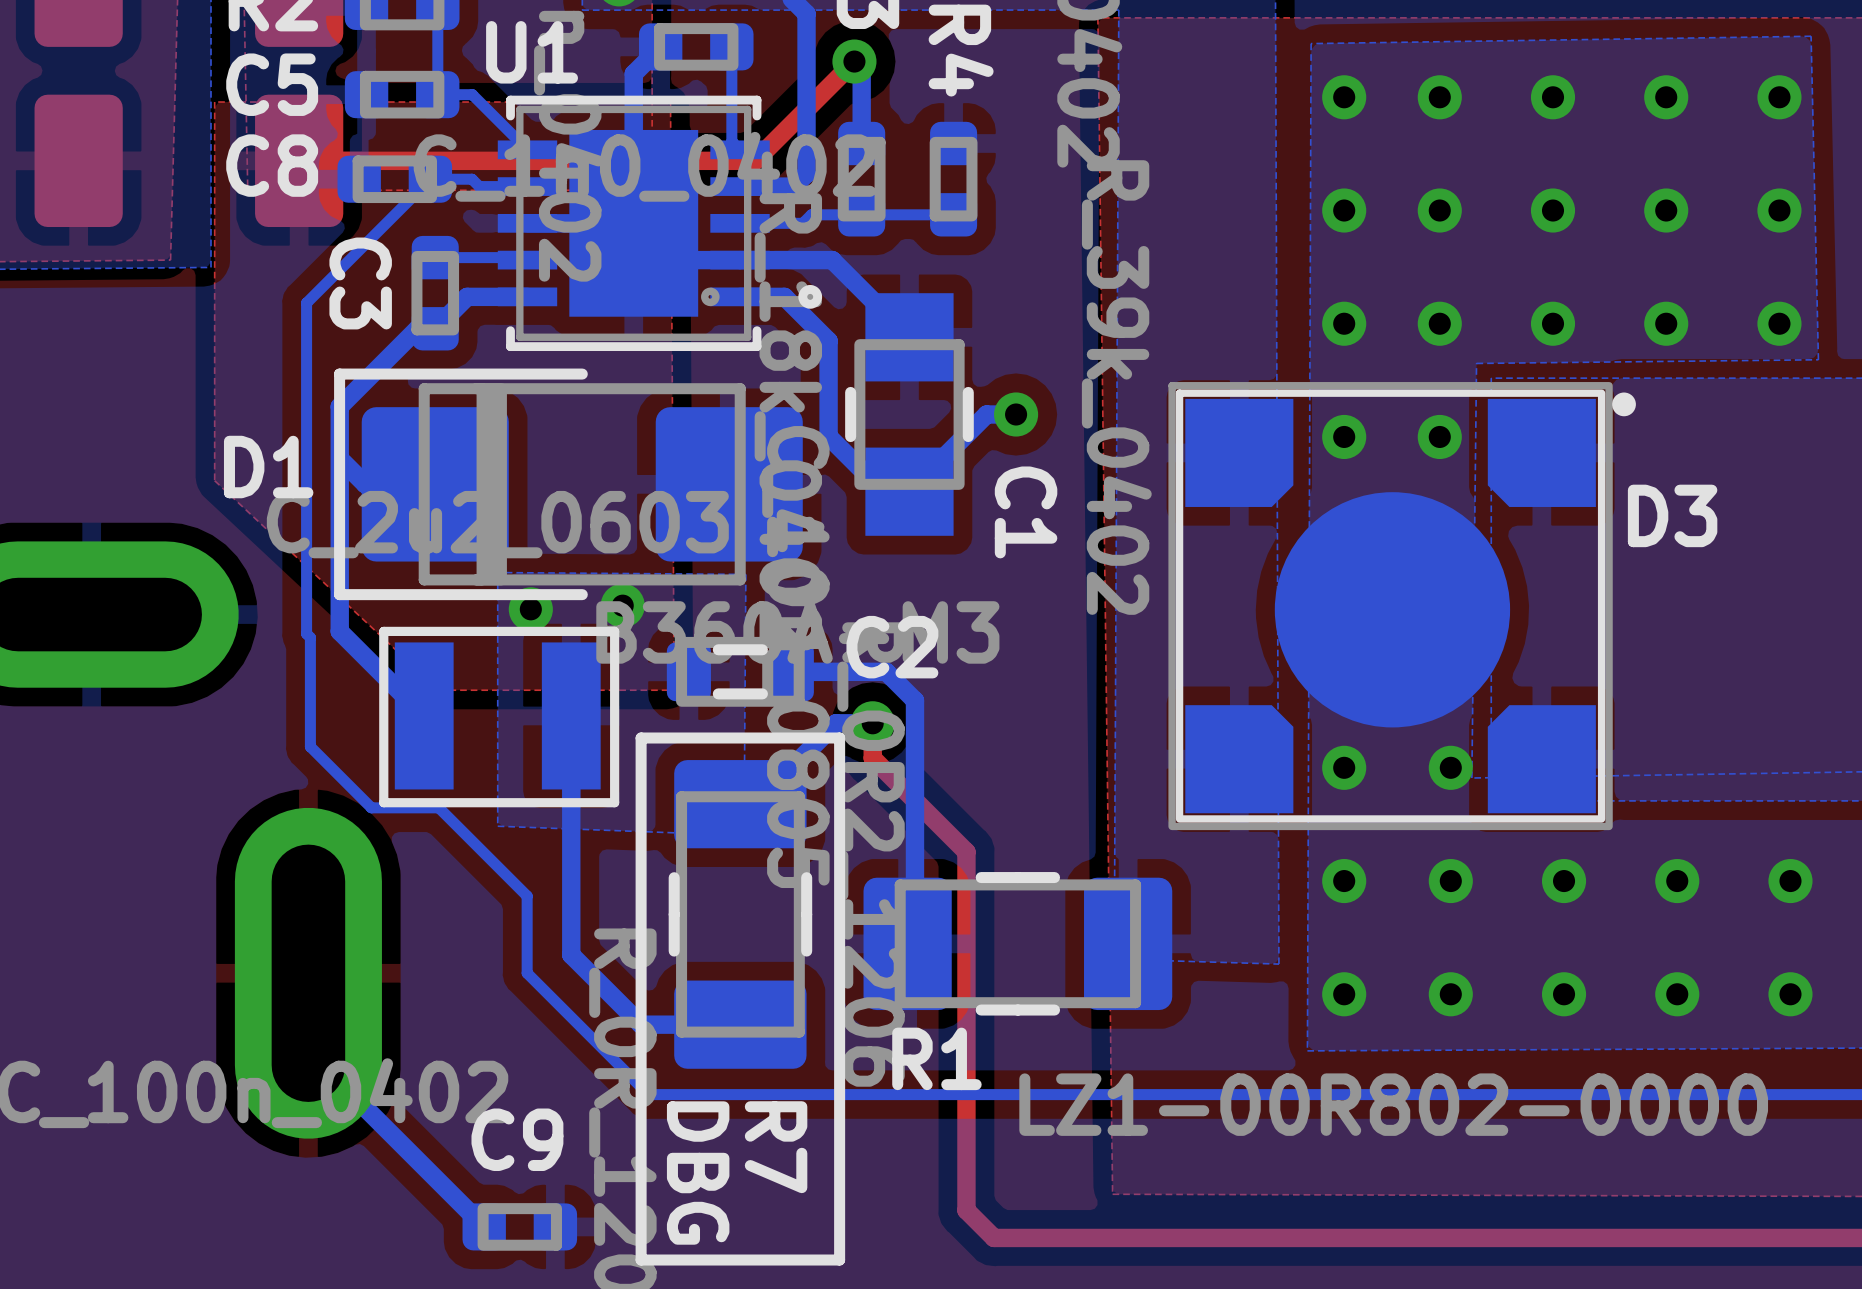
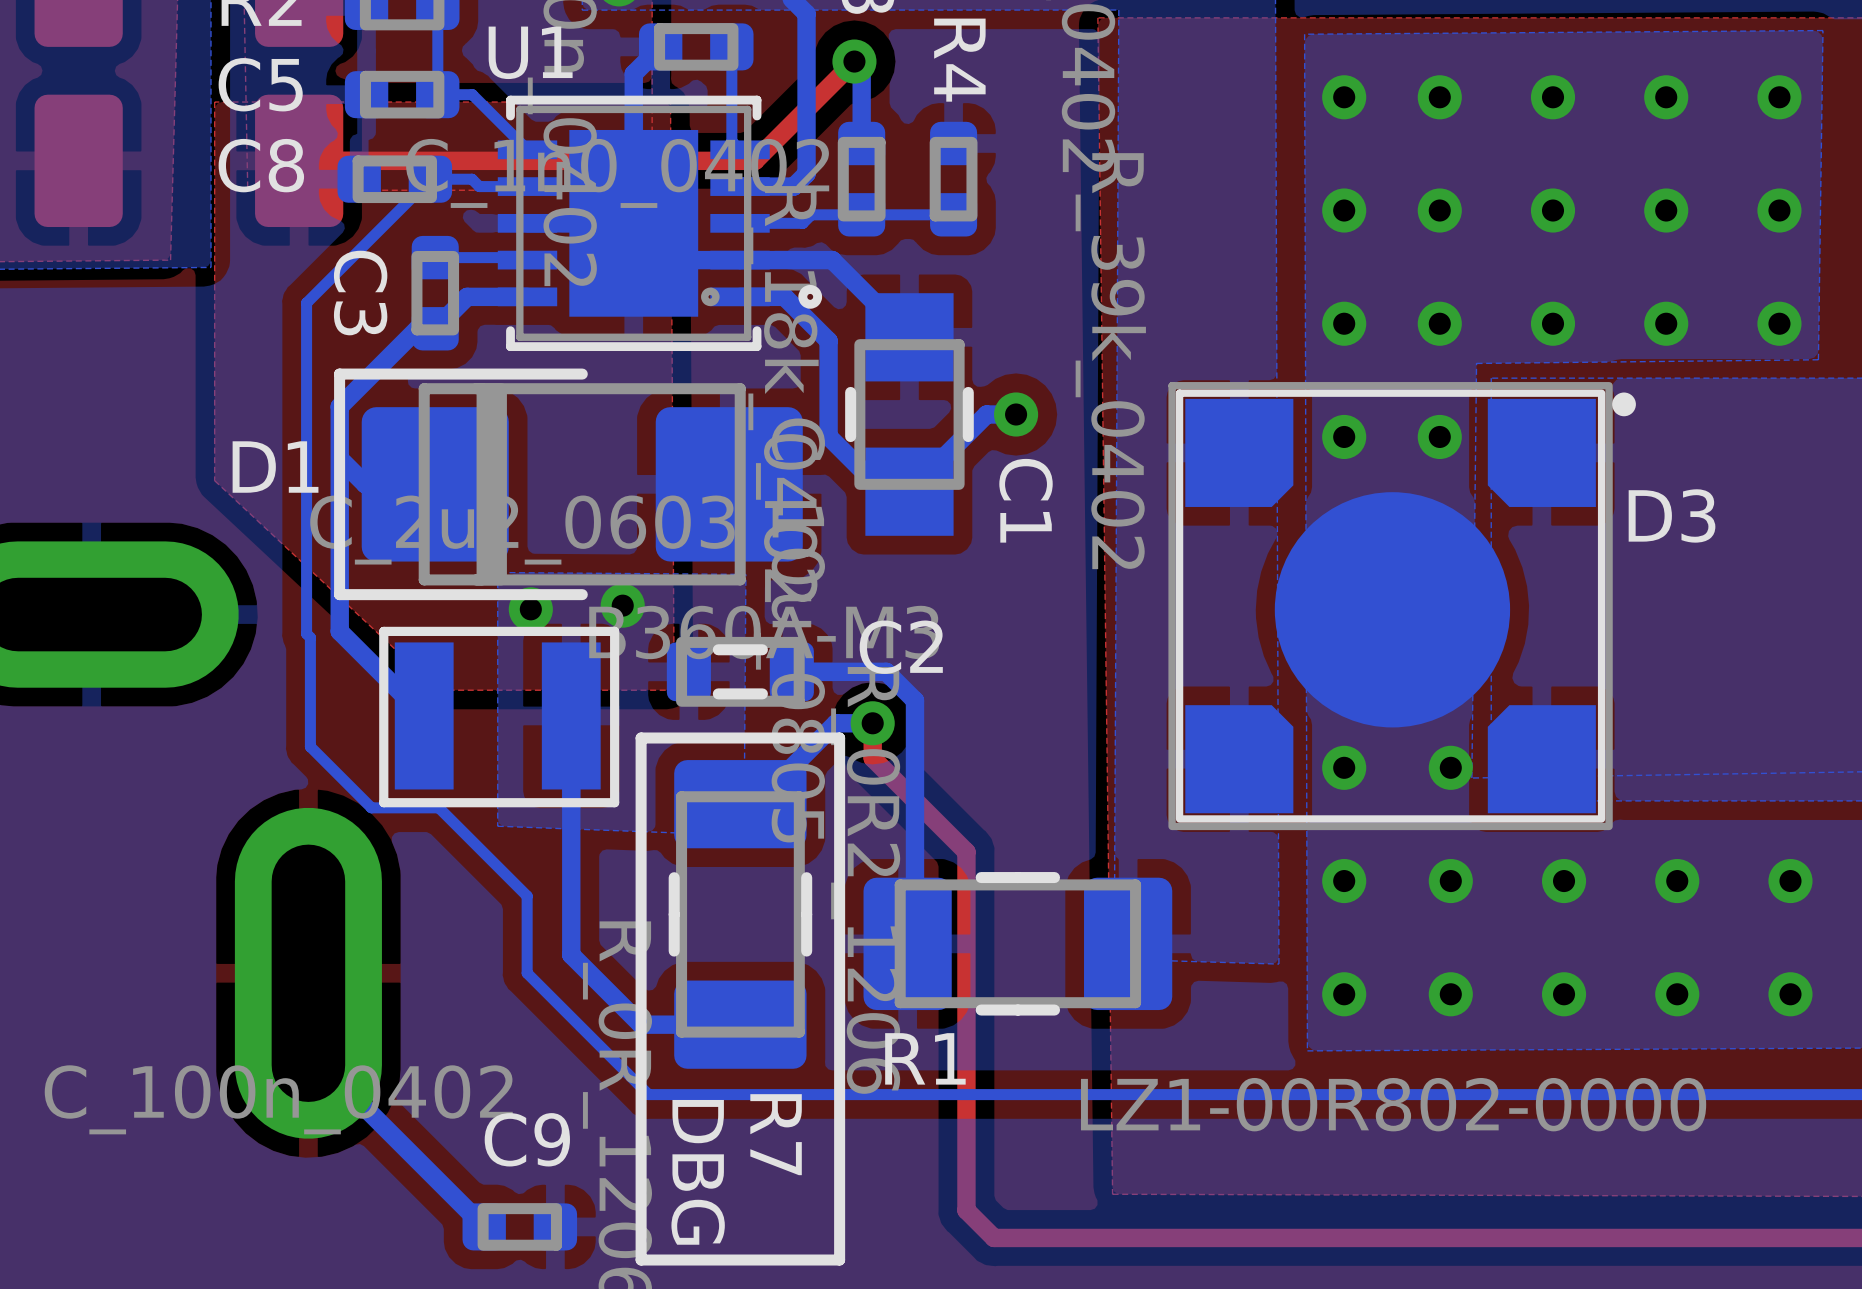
bottom zone outline: (1818, 359) (1811, 36) (1311, 43) (1307, 1050) -> (1818, 359) (1822, 30) (1304, 34) (1307, 1050)

